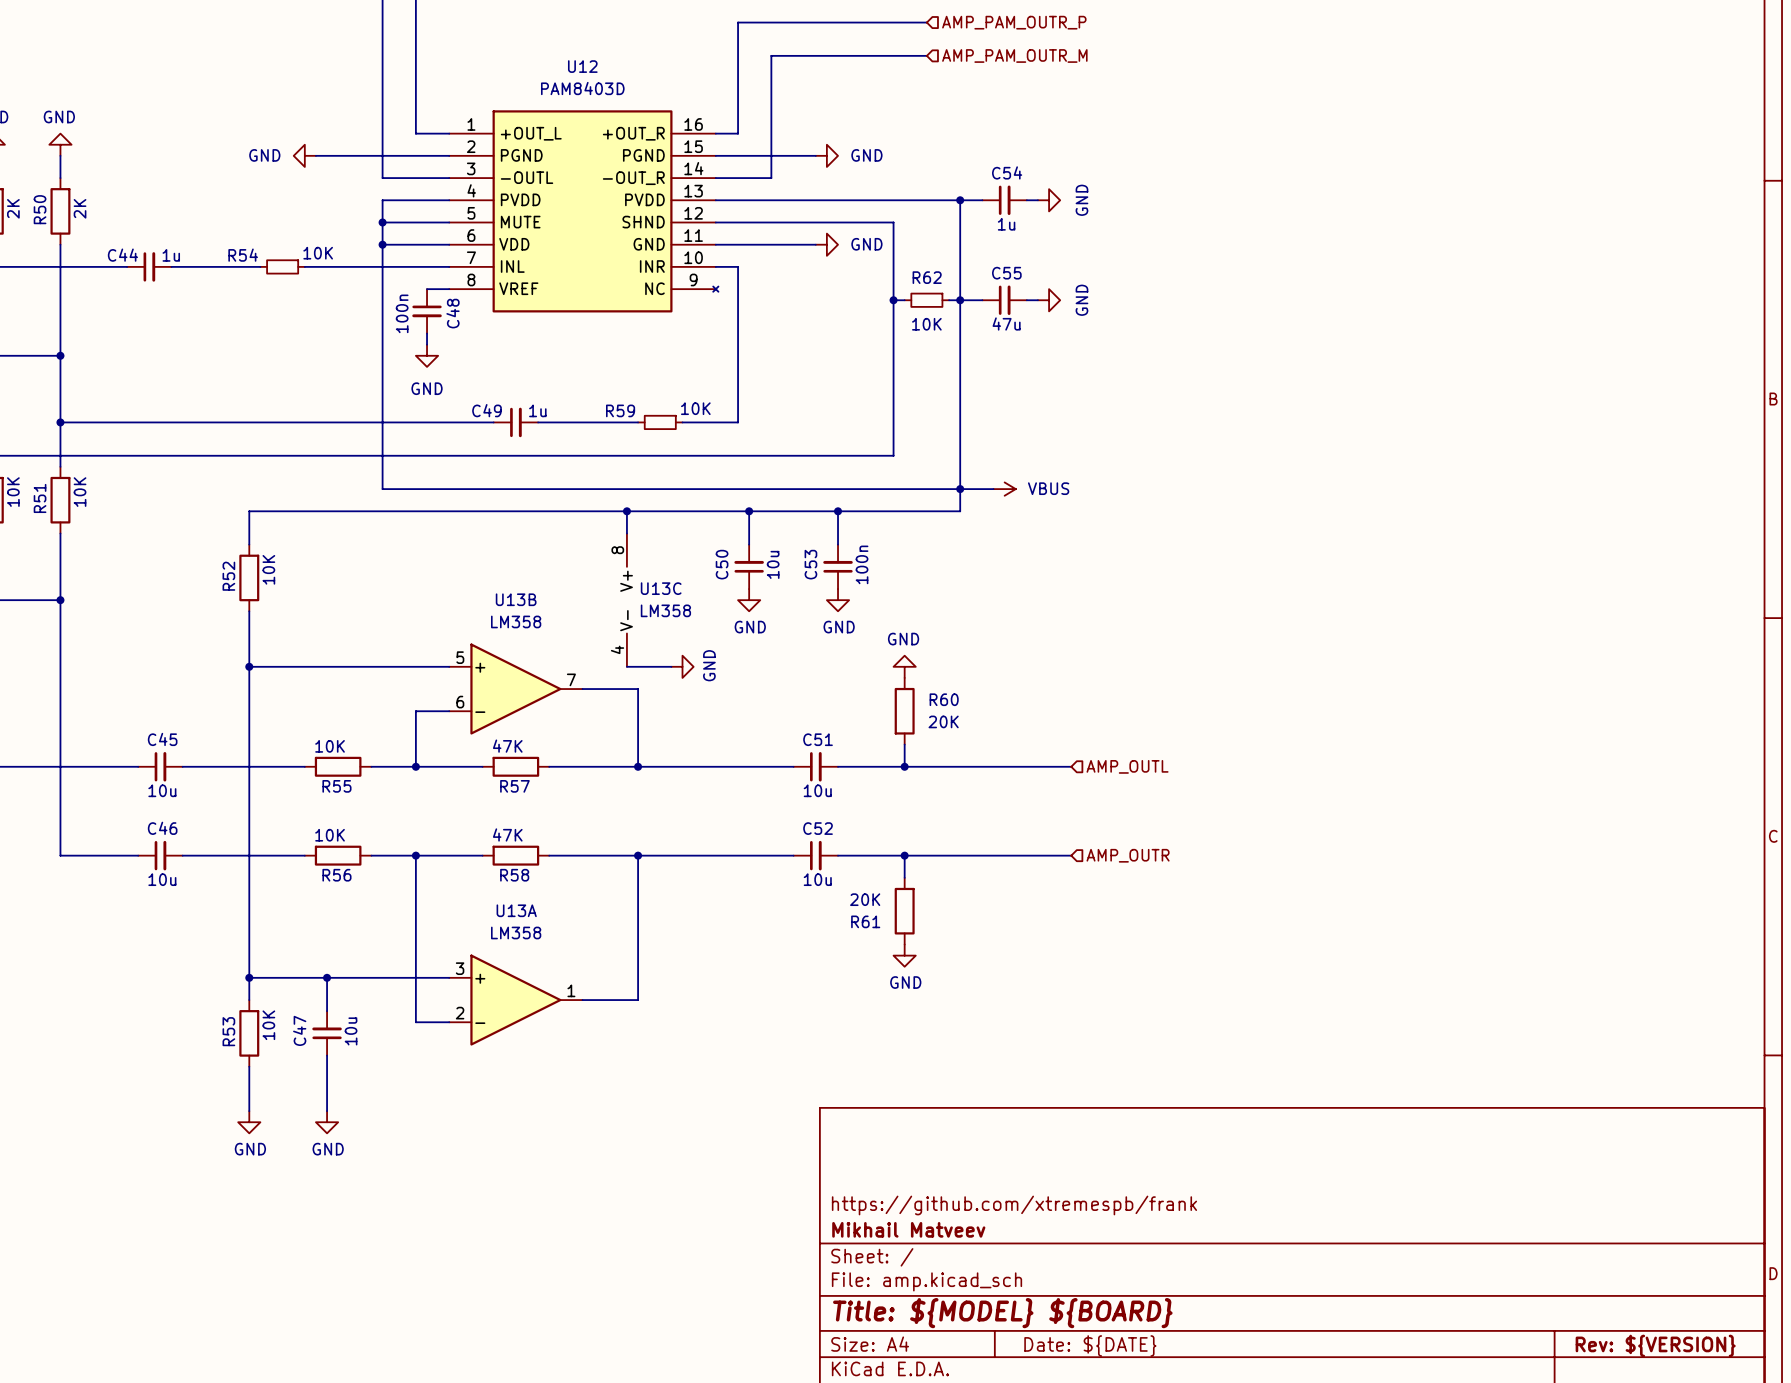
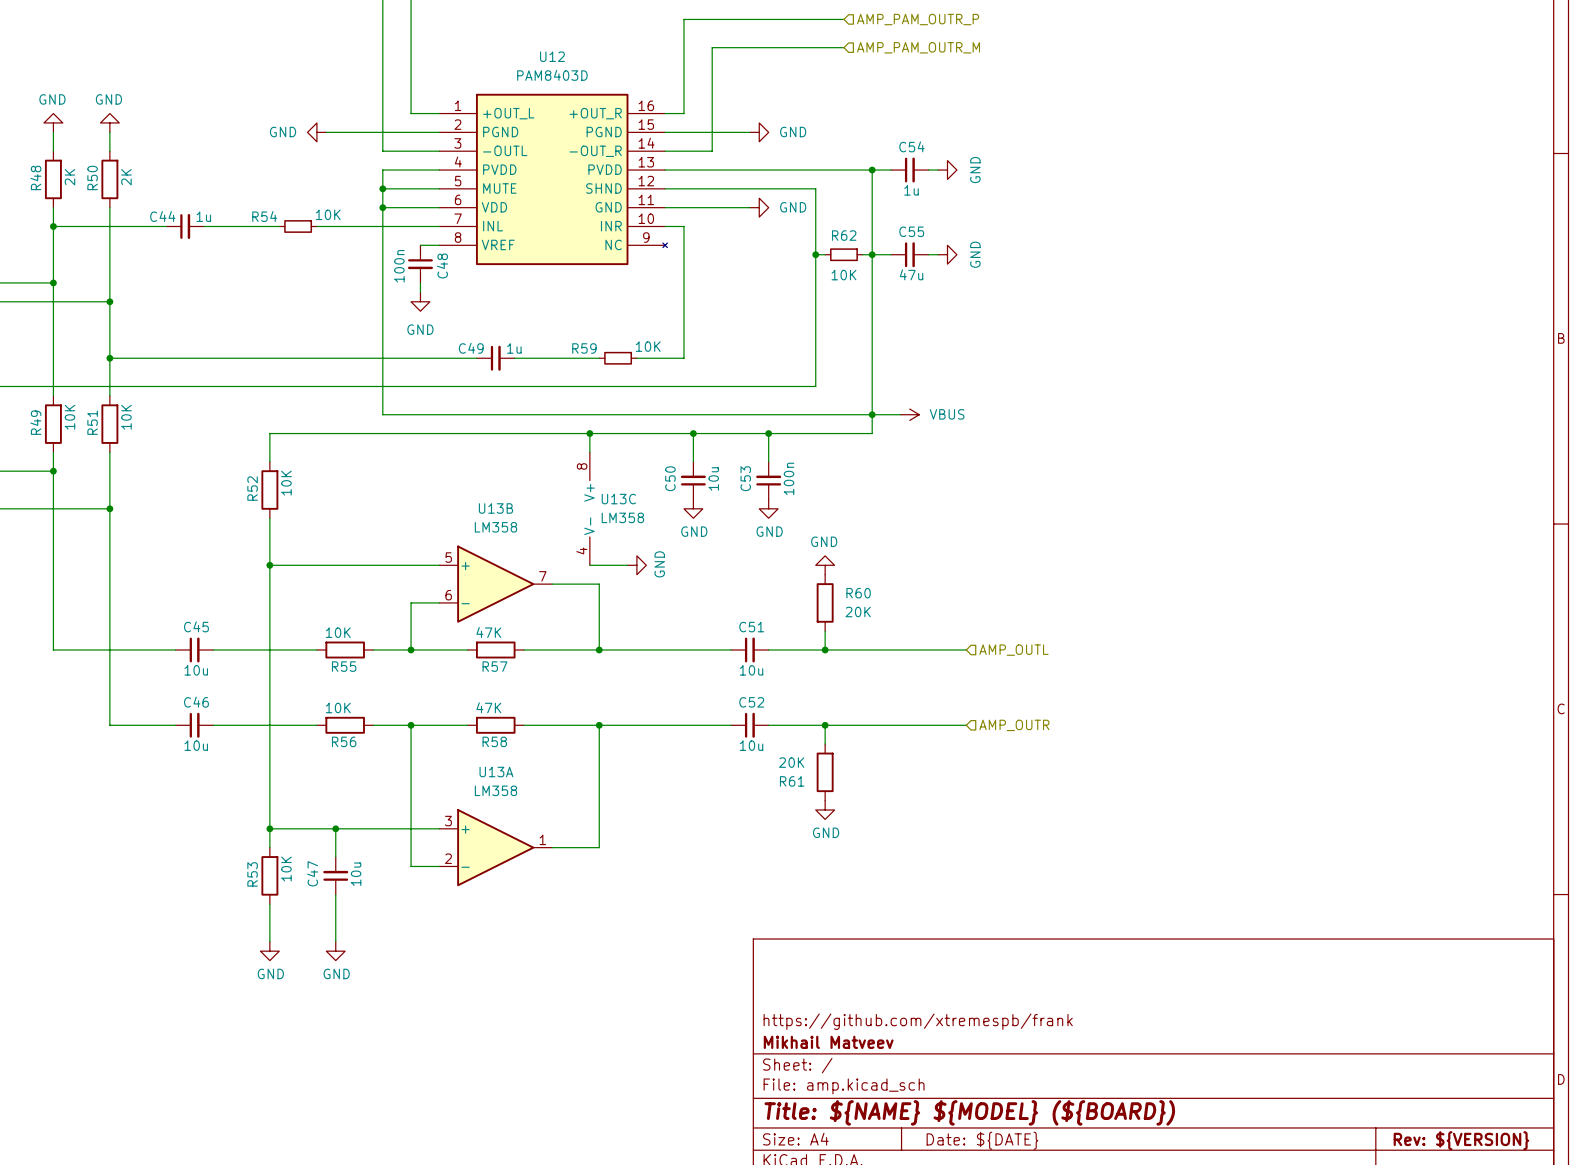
title block: Title: ${MODEL} ${BOARD} (1002, 1313) -> Title: ${NAME} ${MODEL} (${BOARD}) (969, 1112)

